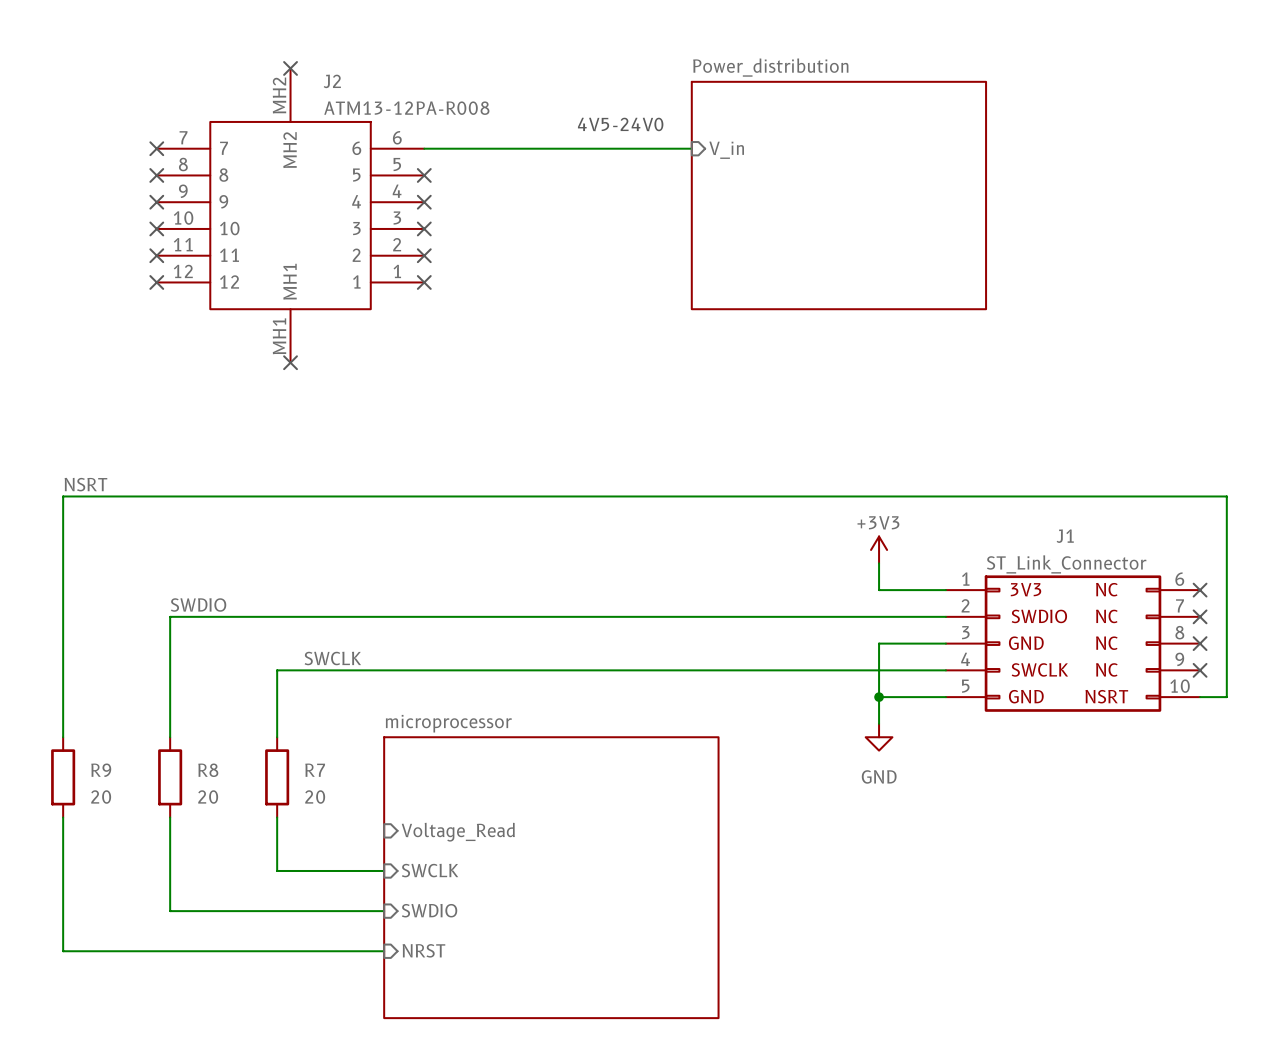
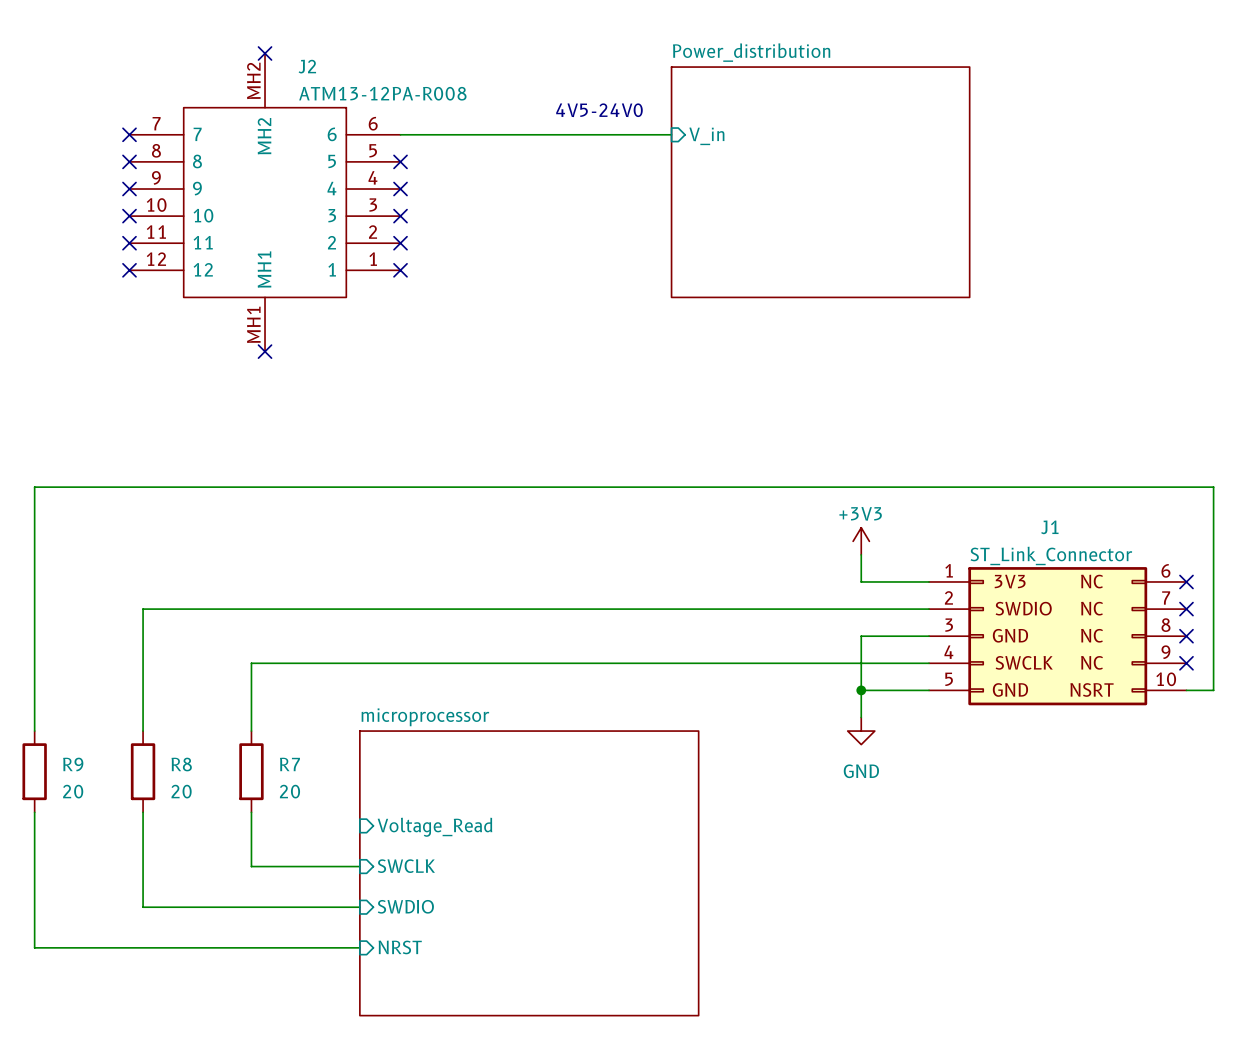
label: NSRT (85, 484) -> none
label: SWDIO (198, 604) -> none
label: SWCLK (332, 658) -> none

